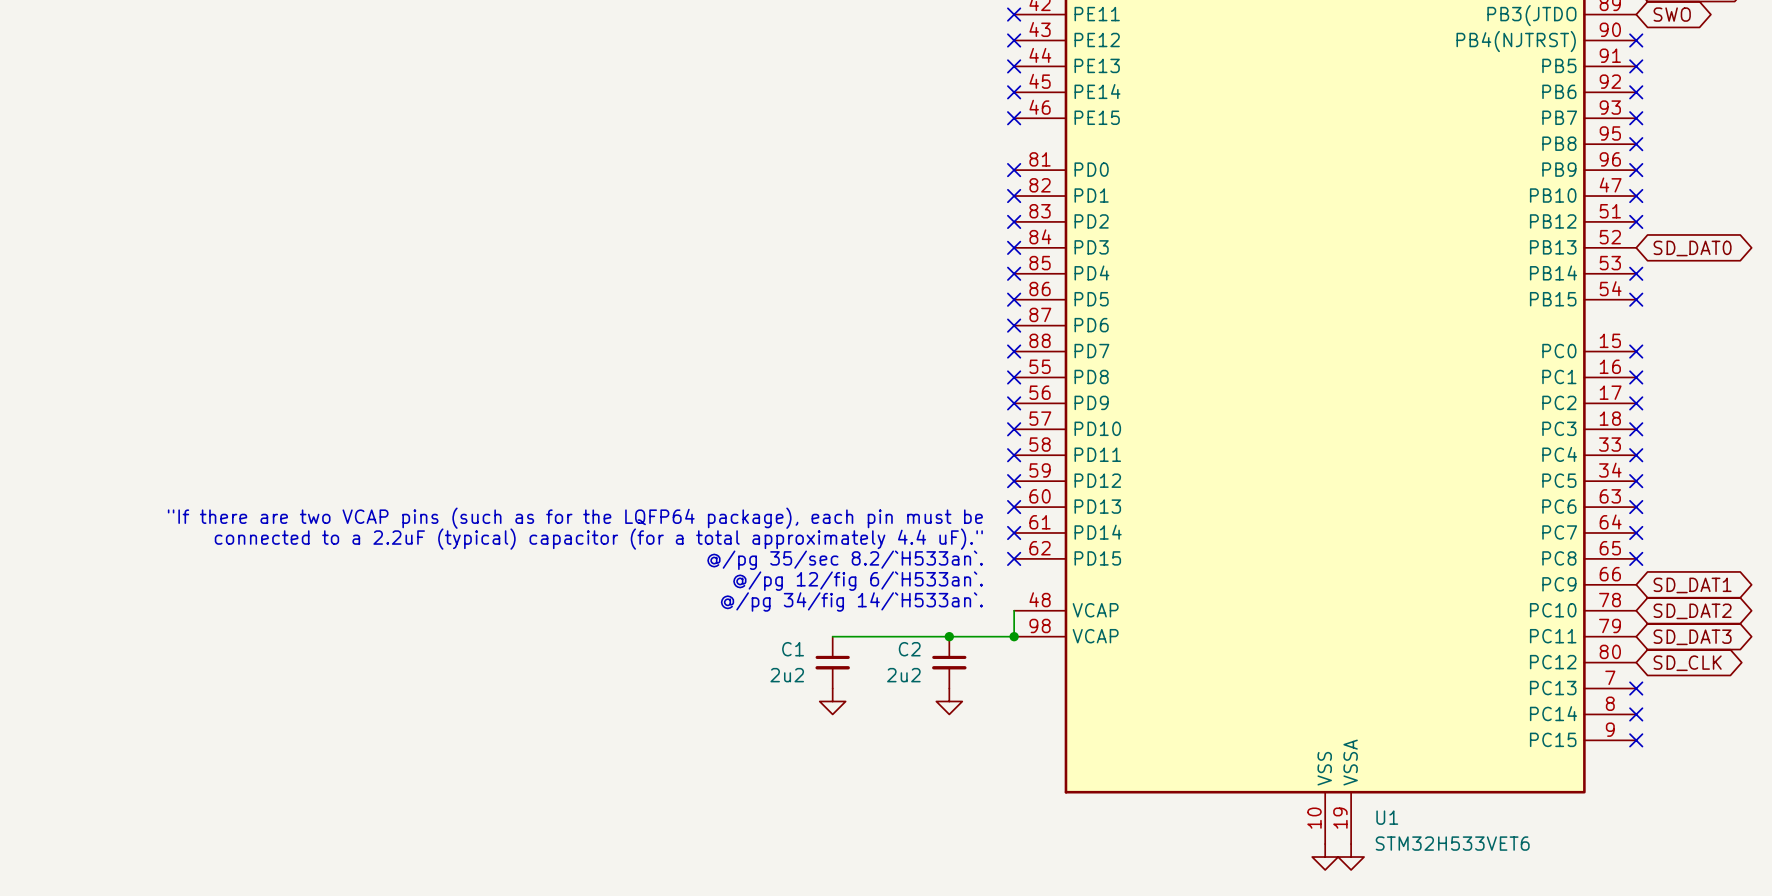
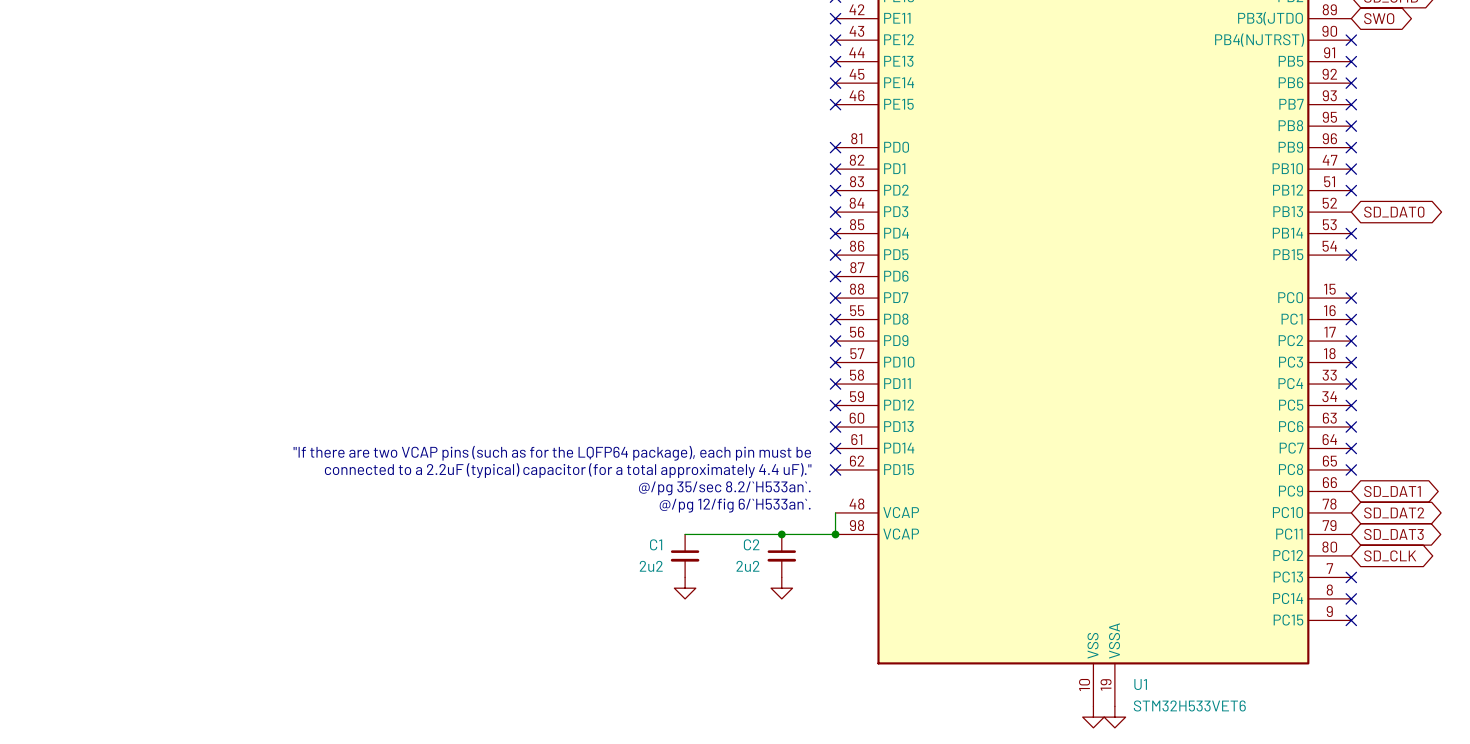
text: "If there are two VCAP pins (such as for the LQFP64 package), each pin must be (575, 518) -> none
text: connected to a 2.2uF (typical) capacitor (for a total approximately 4.4 uF)." (598, 539) -> "If there are two VCAP pins (such as for the LQFP64 package), each pin must be (552, 453)
text: @/pg 35/sec 8.2/`H533an`. (845, 560) -> connected to a 2.2uF (typical) capacitor (for a total approximately 4.4 uF)." (568, 470)
text: @/pg 12/fig 6/`H533an`. (858, 581) -> @/pg 35/sec 8.2/`H533an`. (724, 488)
text: @/pg 34/fig 14/`H533an`. (851, 601) -> @/pg 12/fig 6/`H533an`. (735, 505)

